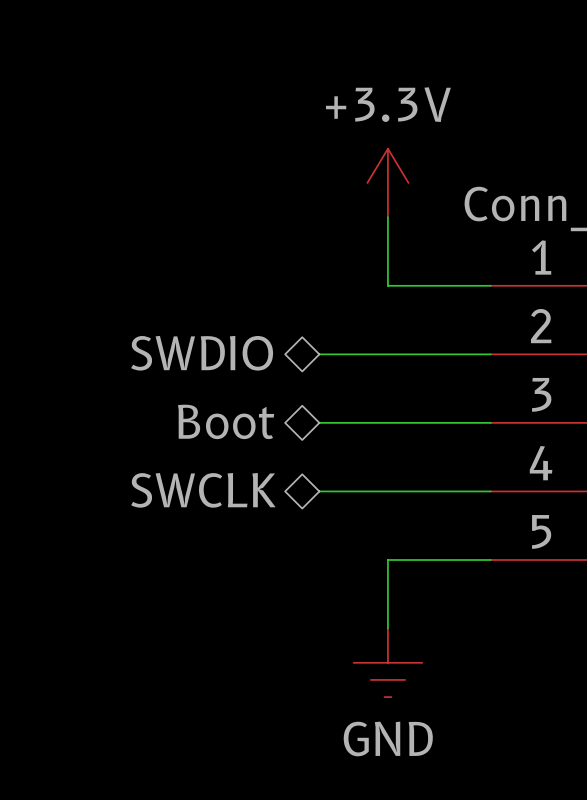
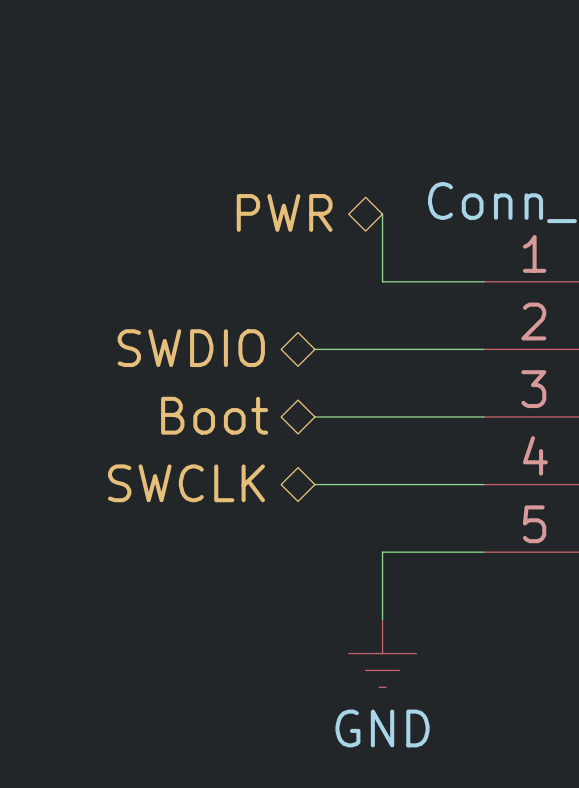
power symbol: +3.3V (387, 182) -> none
hierarchical label: none -> PWR (284, 212)

